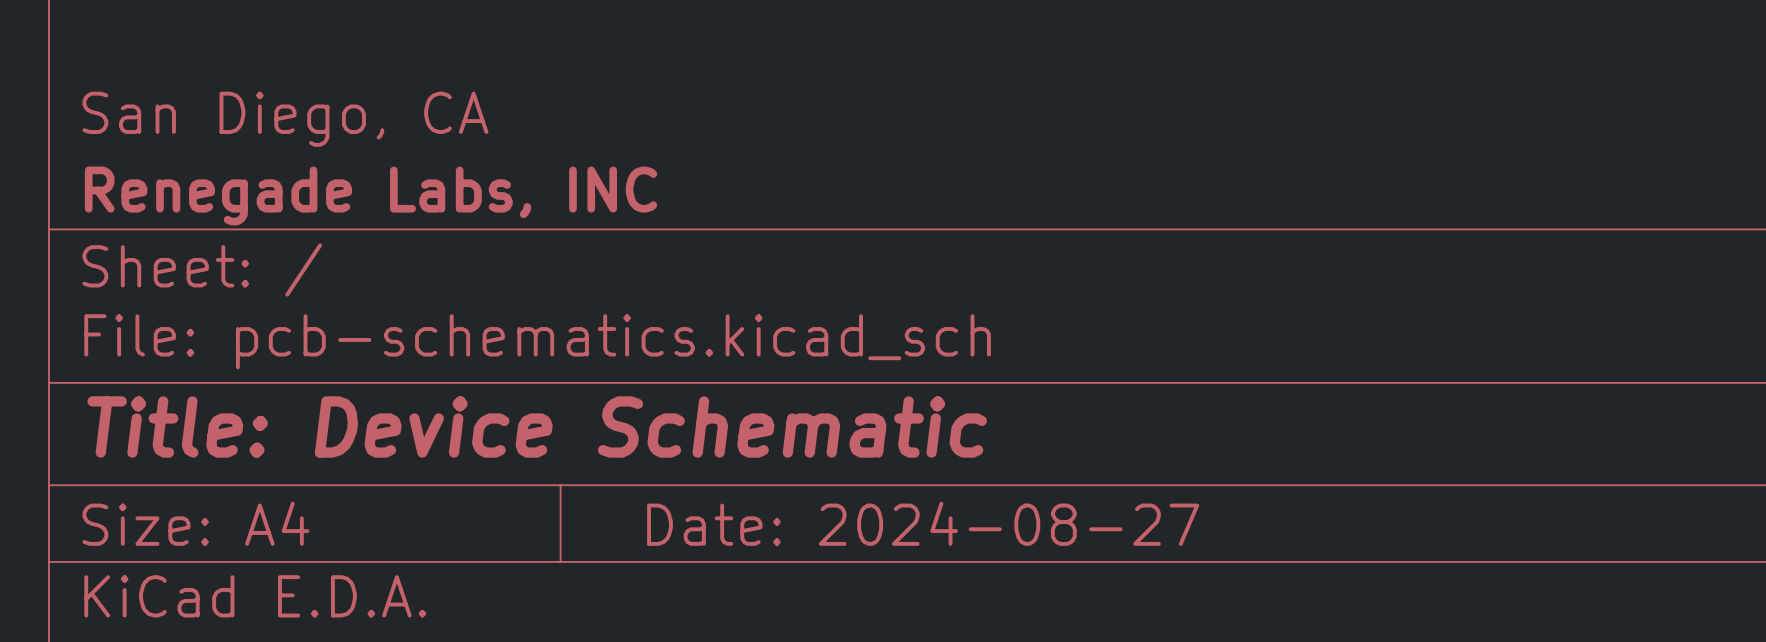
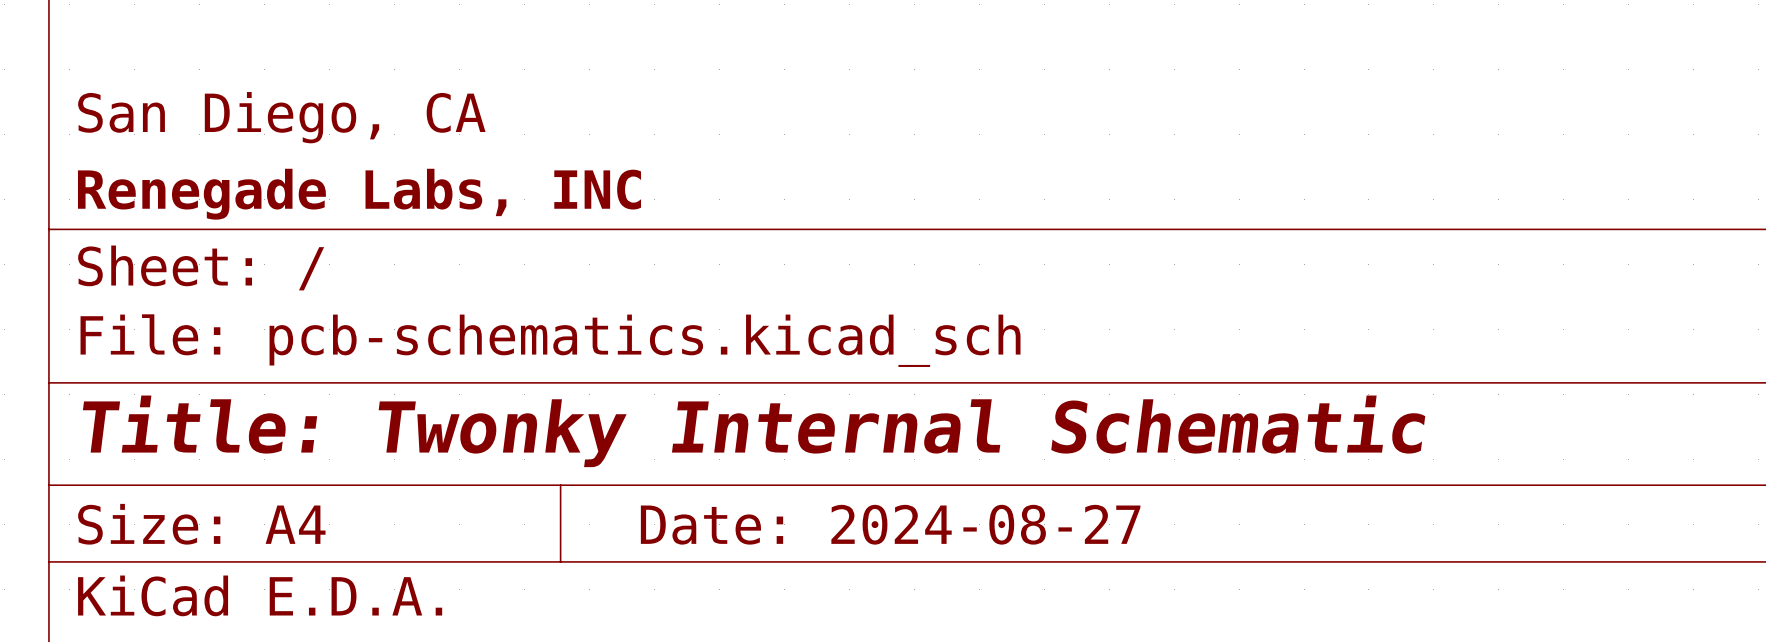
title block: Title: Device Schematic (537, 427) -> Title: Twonky Internal Schematic (754, 431)

